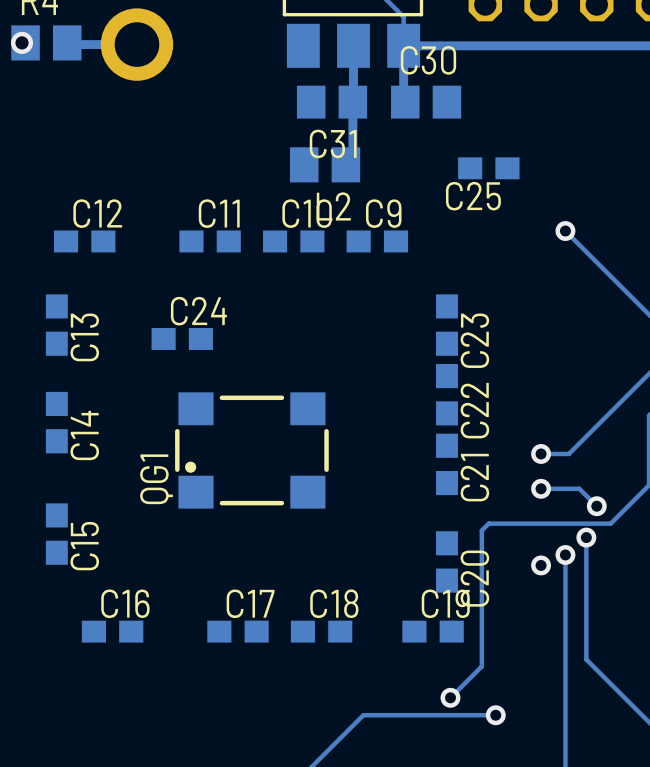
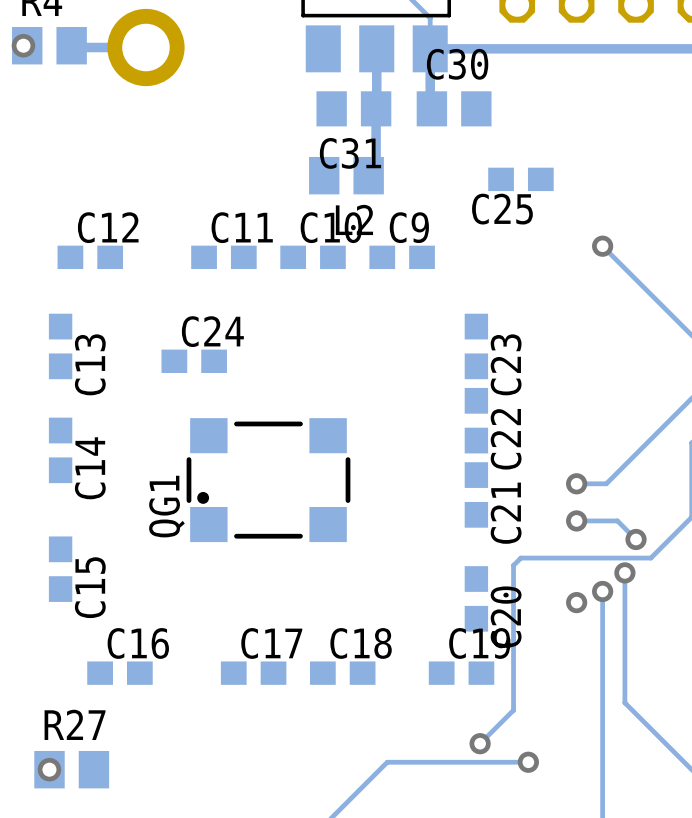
via: none -> (49, 769)
R27: none -> (71, 769)

